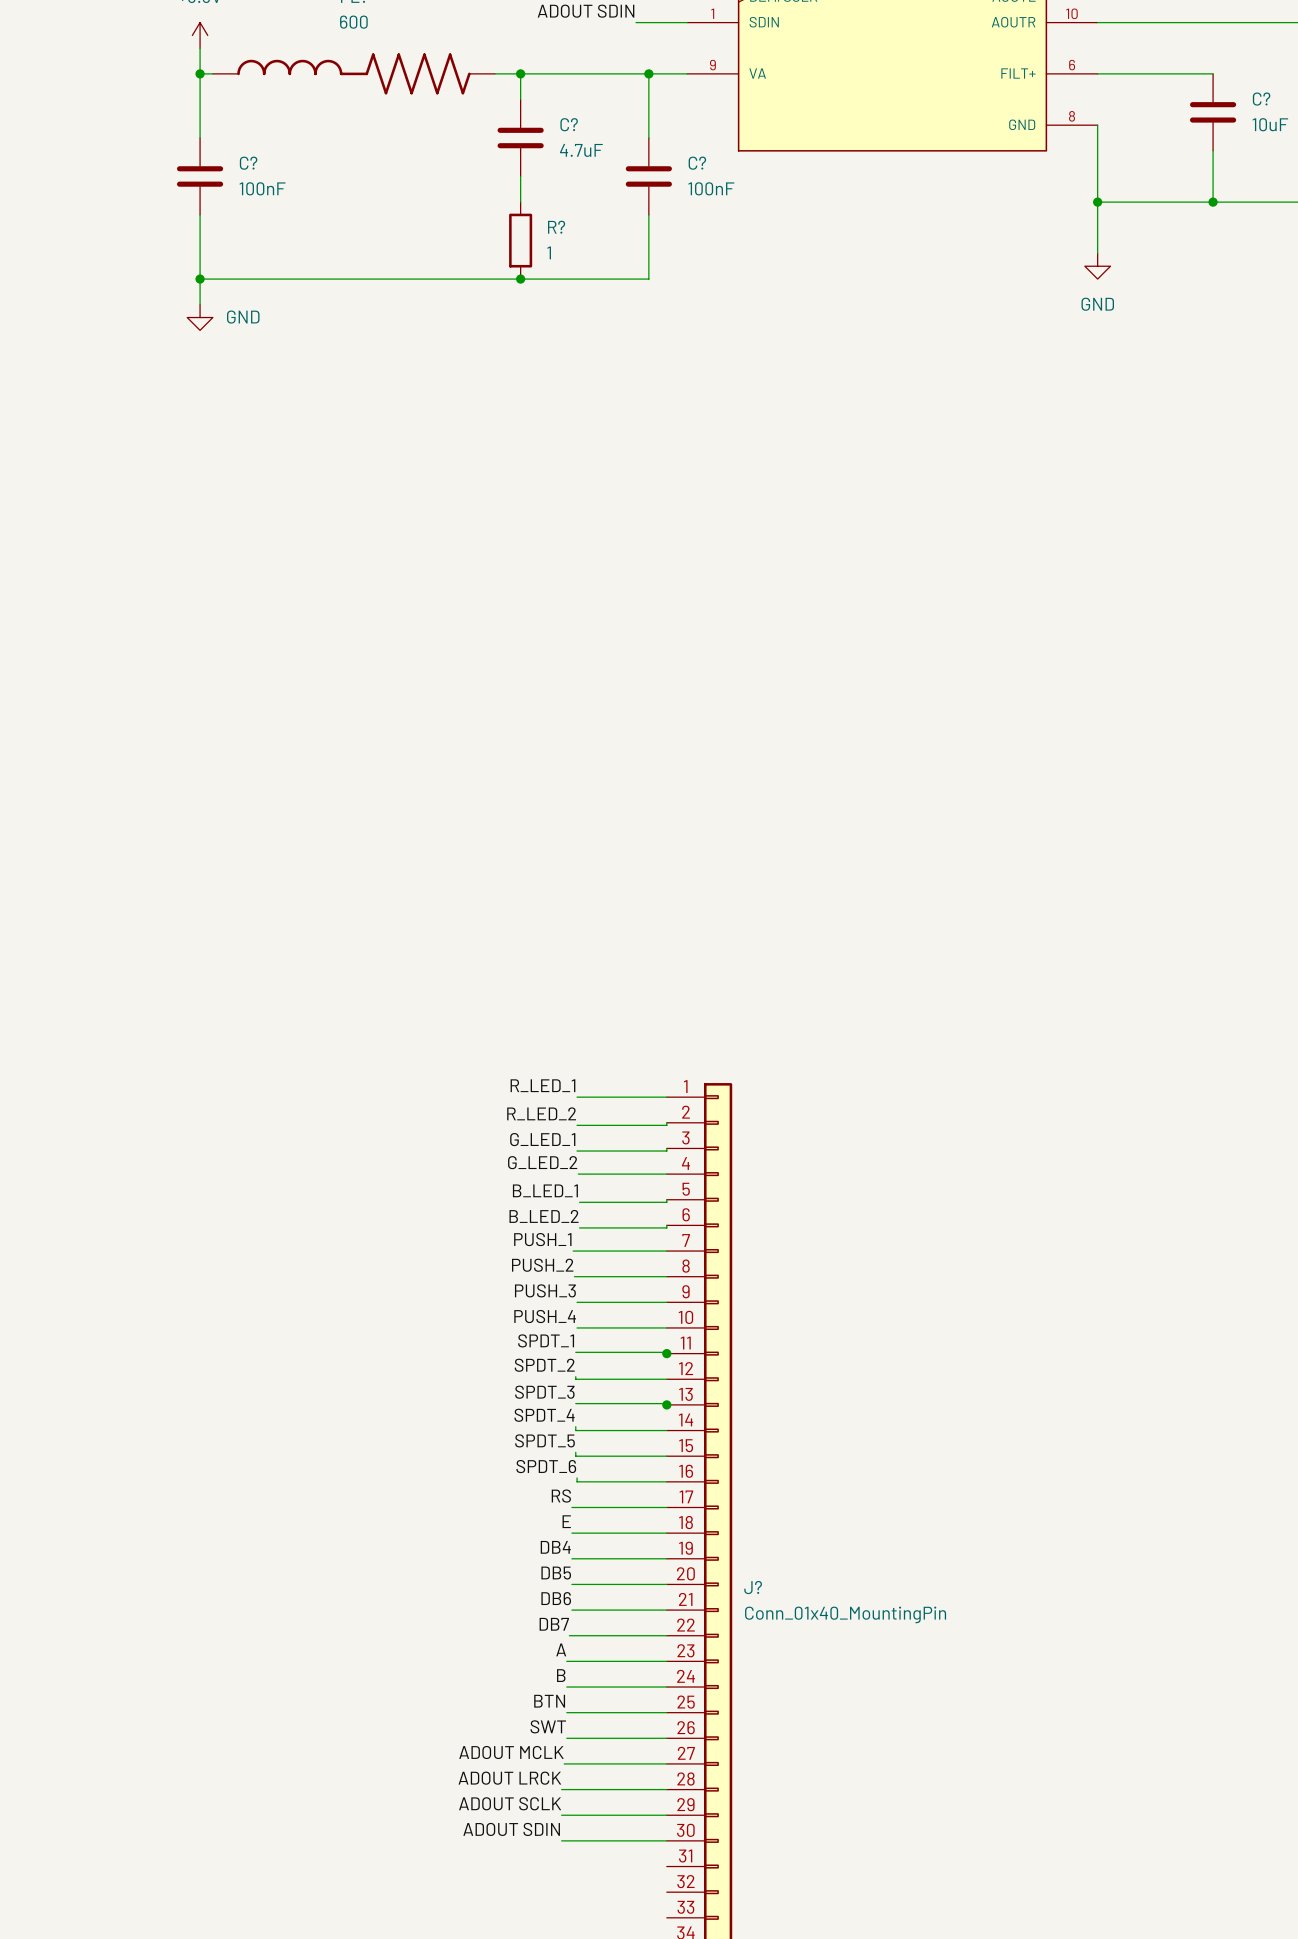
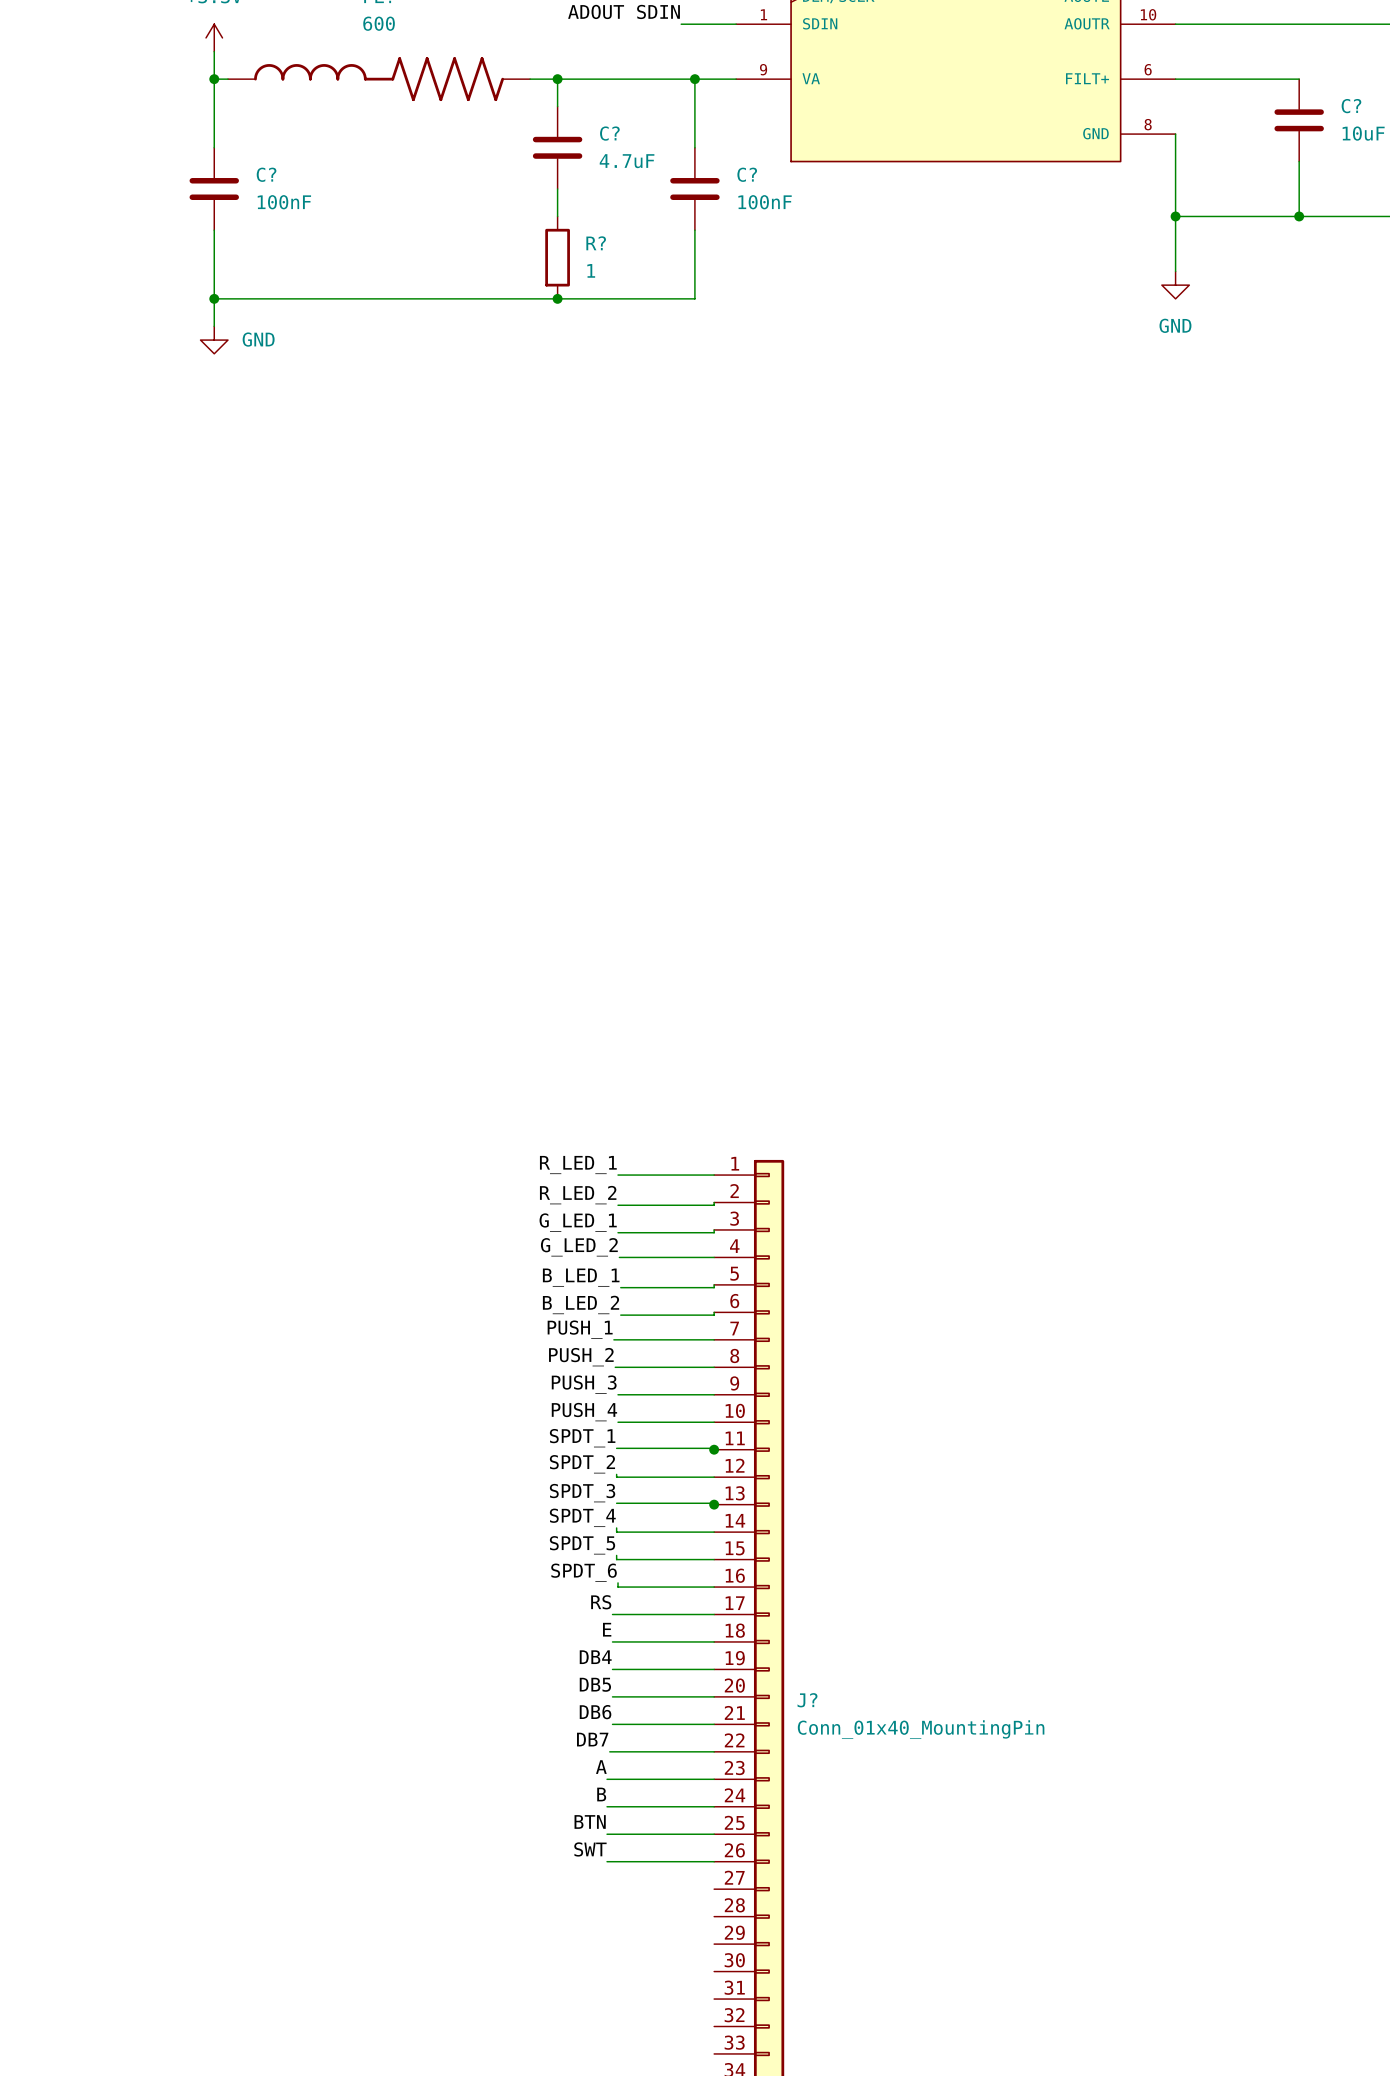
label: ADOUT MCLK (511, 1752) -> none
wire: (564, 1763) (666, 1763) -> none
label: ADOUT LRCK (509, 1778) -> none
wire: (561, 1789) (666, 1789) -> none
label: ADOUT SCLK (510, 1803) -> none
wire: (561, 1815) (666, 1815) -> none
label: ADOUT SDIN (511, 1829) -> none
wire: (561, 1840) (666, 1840) -> none

